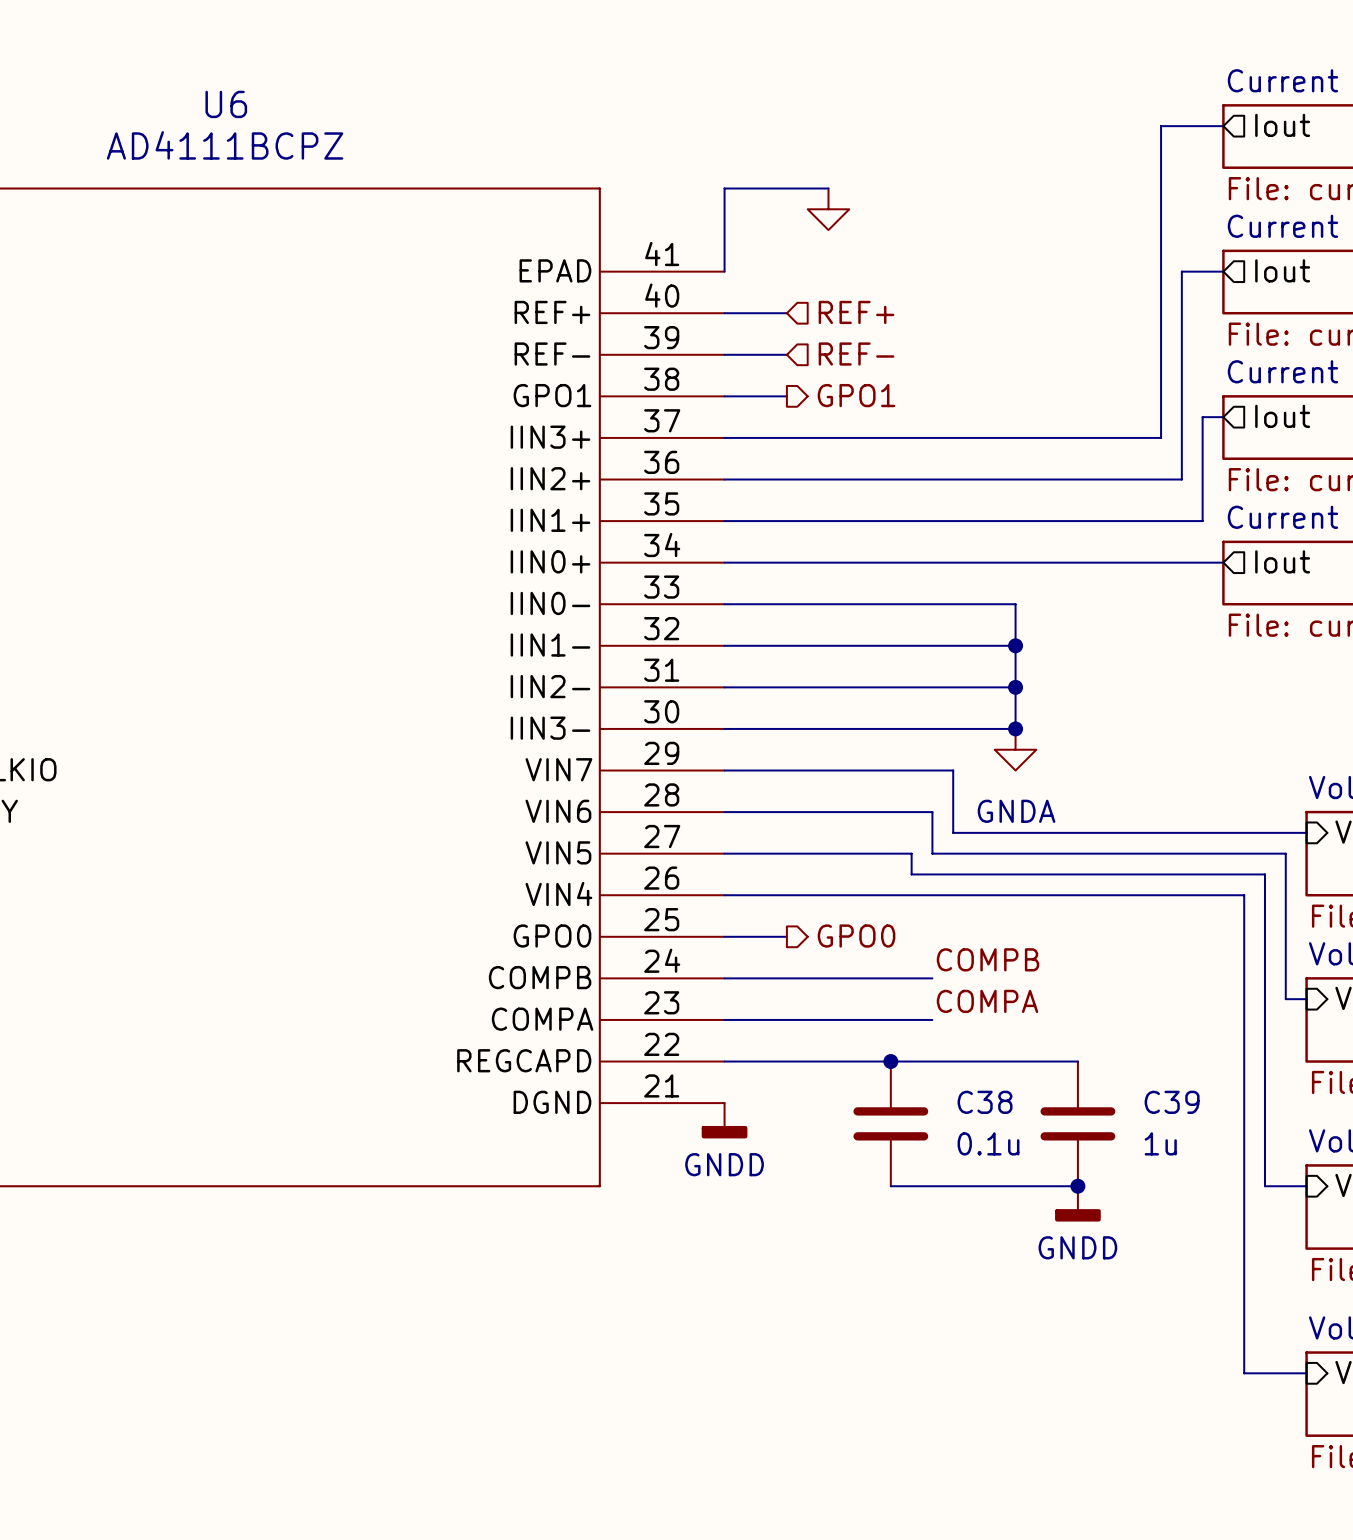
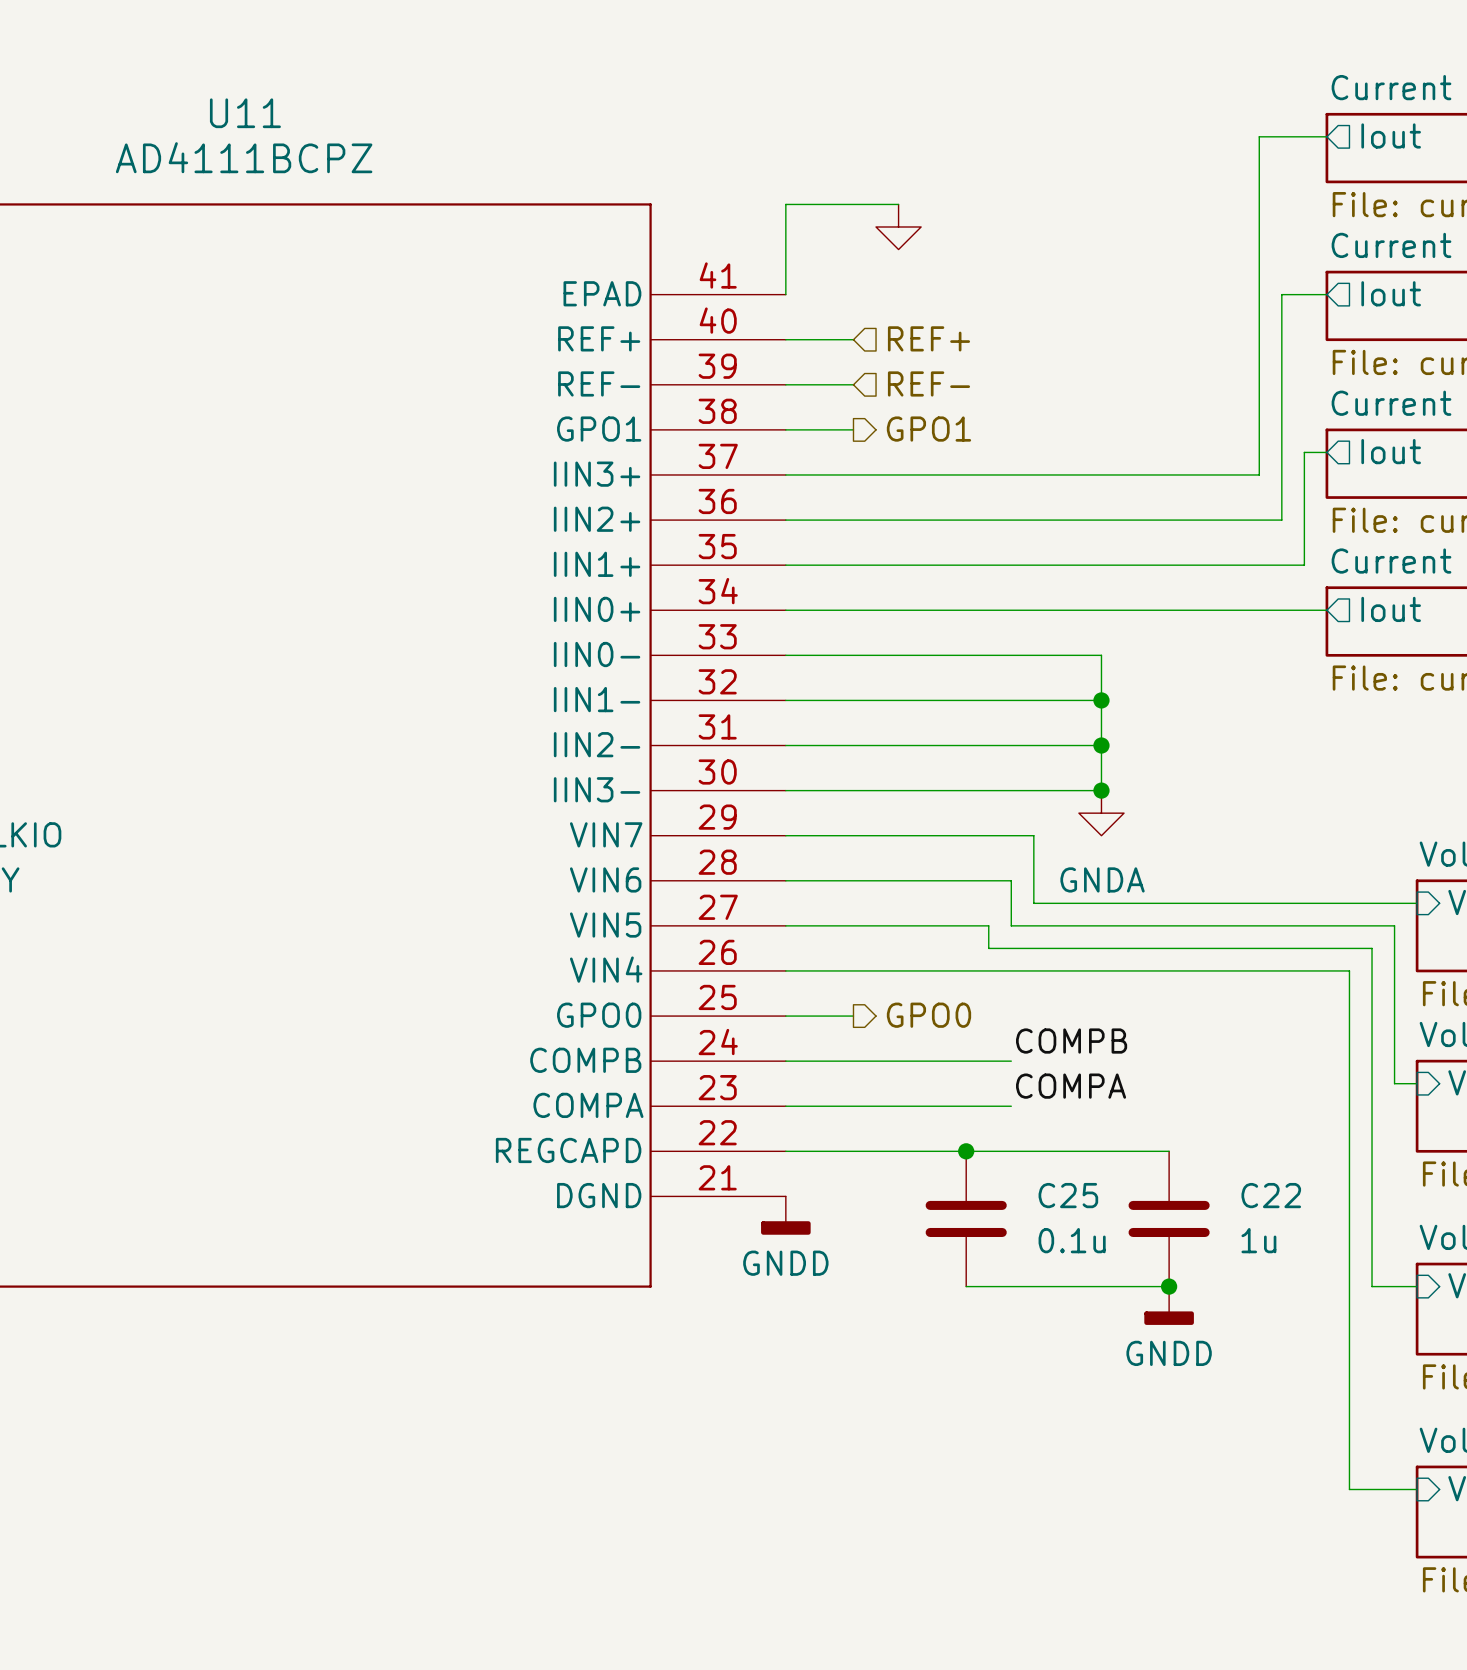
U6 name: U6 (226, 104) -> U11 (245, 113)
C38 name: C38 (985, 1102) -> C25 (1068, 1195)
C39 name: C39 (1172, 1102) -> C22 (1271, 1195)

